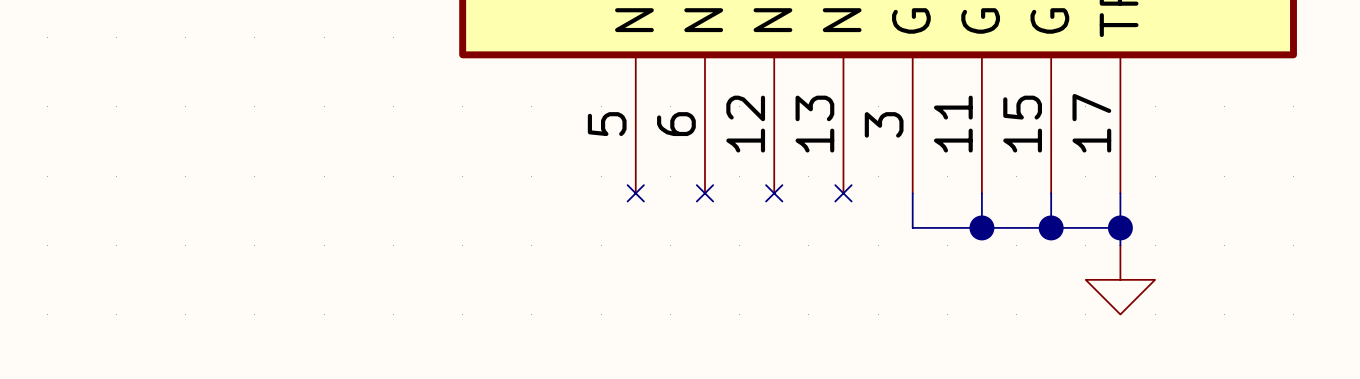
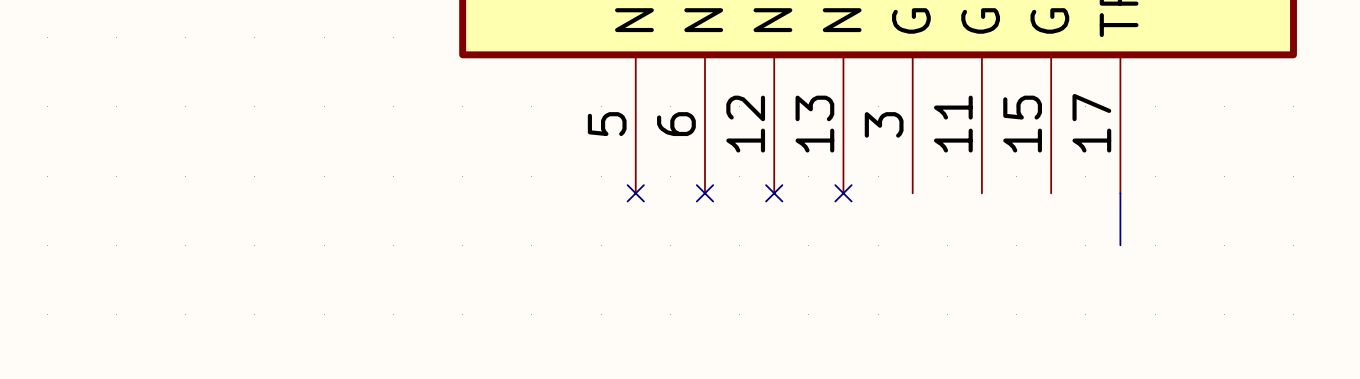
wire: (912, 193) (912, 227) (1120, 227) -> none
wire: (981, 193) (981, 227) -> none
wire: (1051, 193) (1051, 227) -> none
junction: (981, 227) -> none
junction: (1051, 227) -> none
junction: (1120, 227) -> none
power symbol: (1120, 279) -> none

